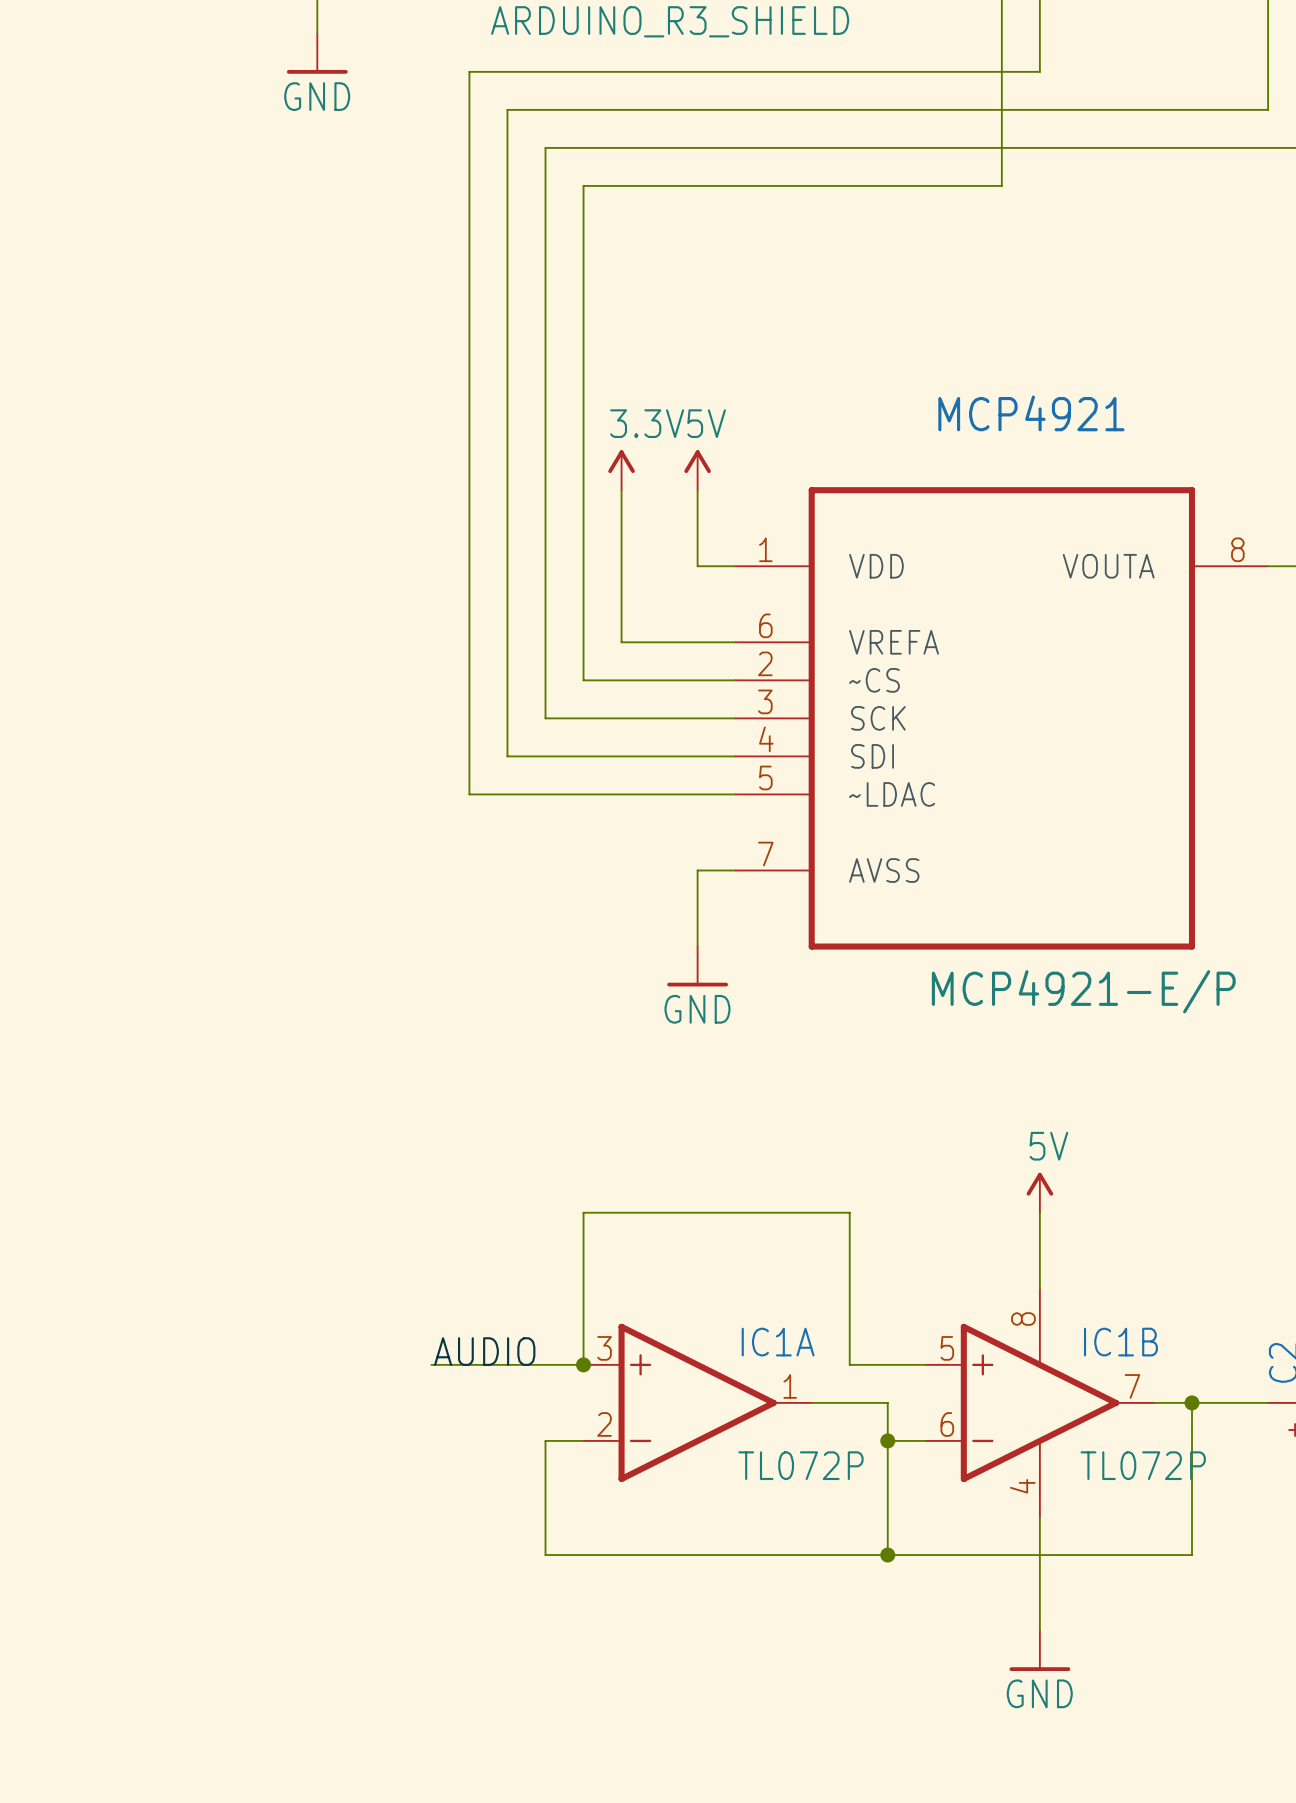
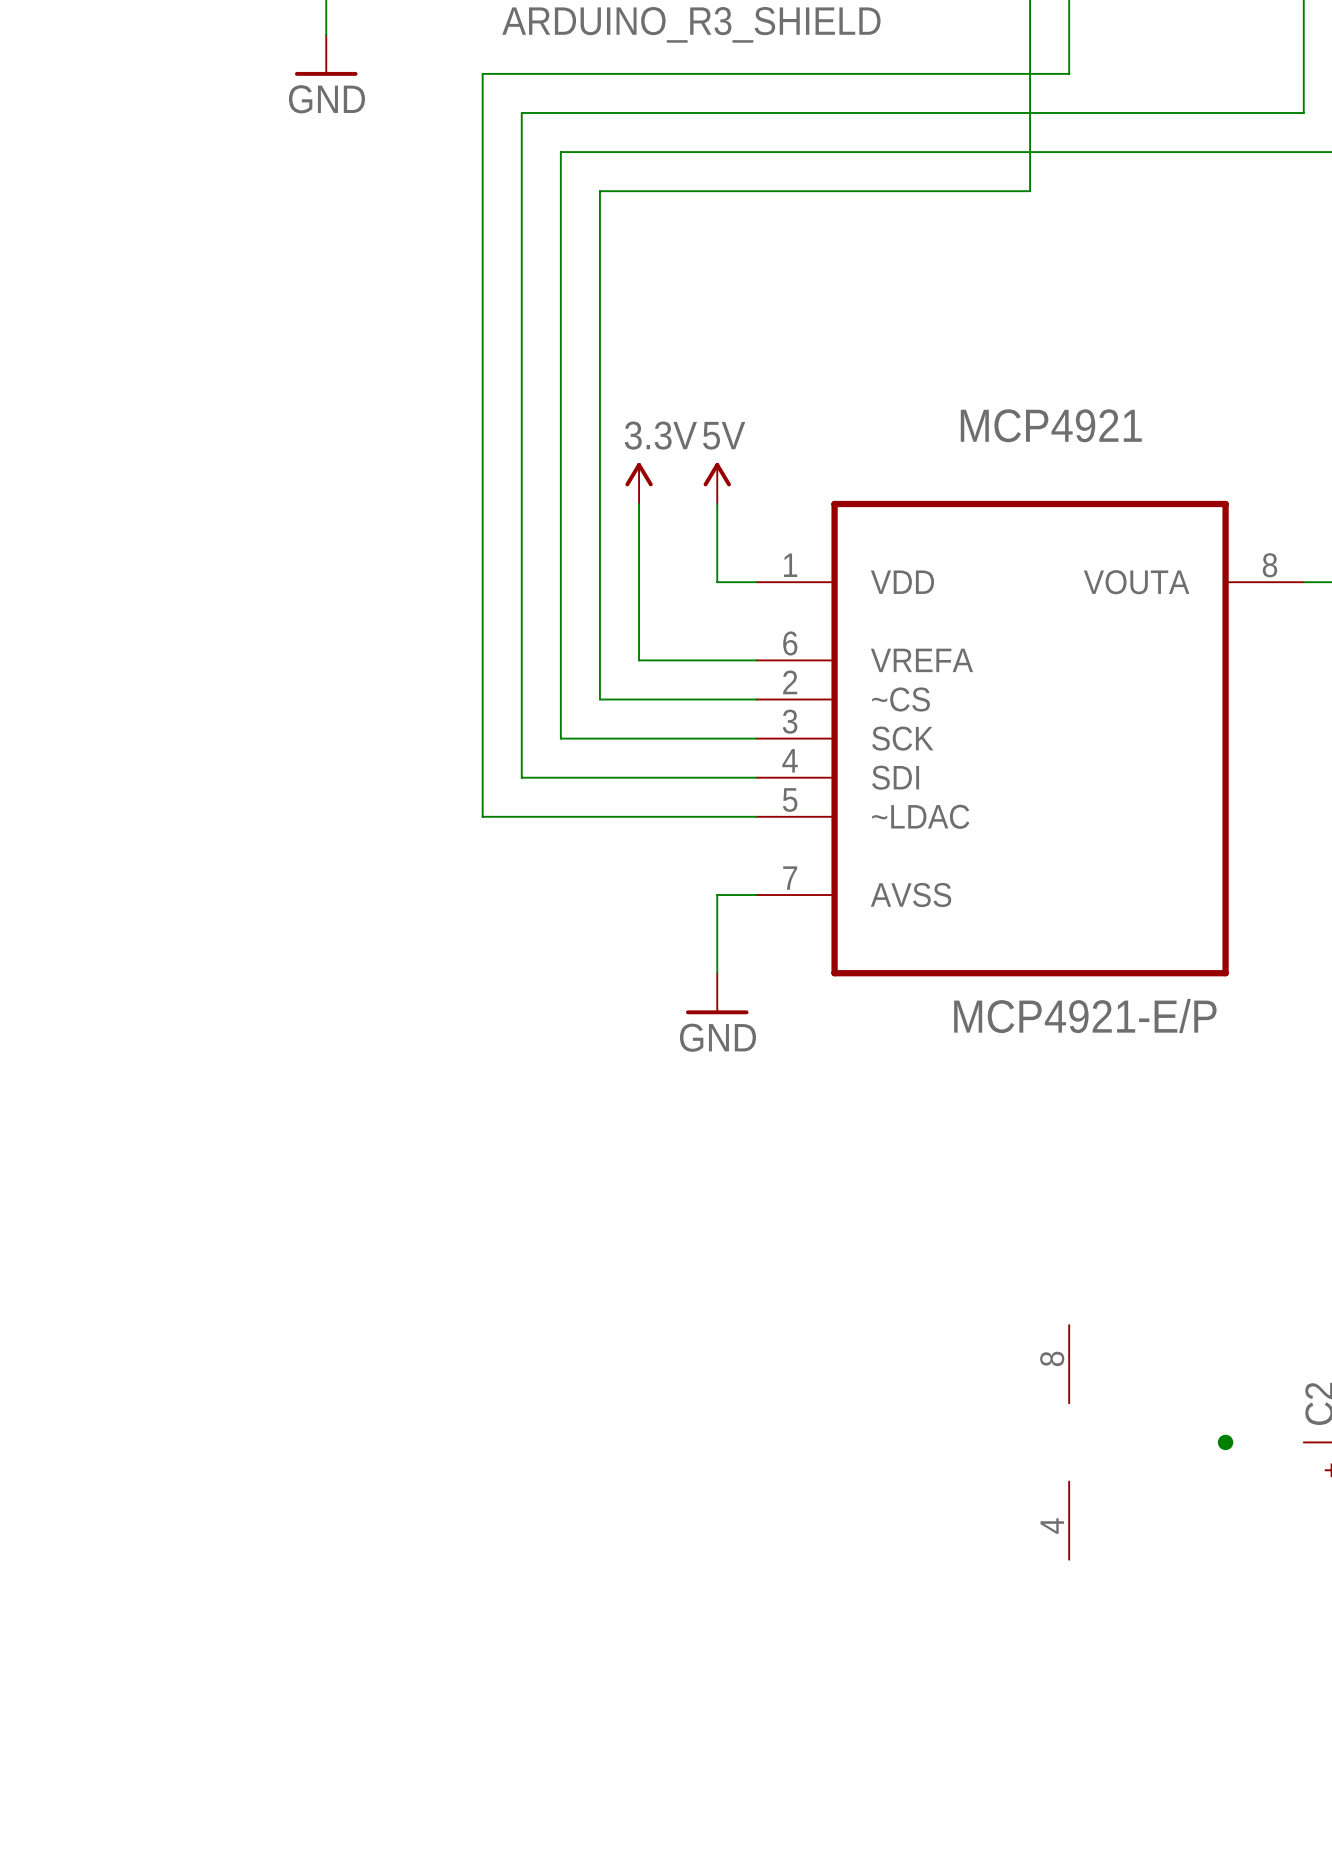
power symbol: 5V (1039, 1192) -> none
wire: (1039, 1212) (1039, 1288) -> none
label: AUDIO (484, 1351) -> none
wire: (431, 1364) (583, 1364) (583, 1212) (849, 1212) (849, 1364) (925, 1364) -> none
junction: (583, 1364) -> none
IC1A: TL072P (697, 1402) -> none
wire: (811, 1402) (887, 1402) (887, 1555) -> none
IC1B: TL072P (1039, 1402) -> none
wire: (1153, 1402) (1268, 1402) -> none
wire: (1192, 1402) (1192, 1555) (545, 1555) (545, 1440) (583, 1440) -> none
wire: (887, 1440) (925, 1440) -> none
junction: (887, 1440) -> none
wire: (1039, 1517) (1039, 1631) -> none
junction: (887, 1555) -> none
power symbol: GND (1039, 1651) -> none

